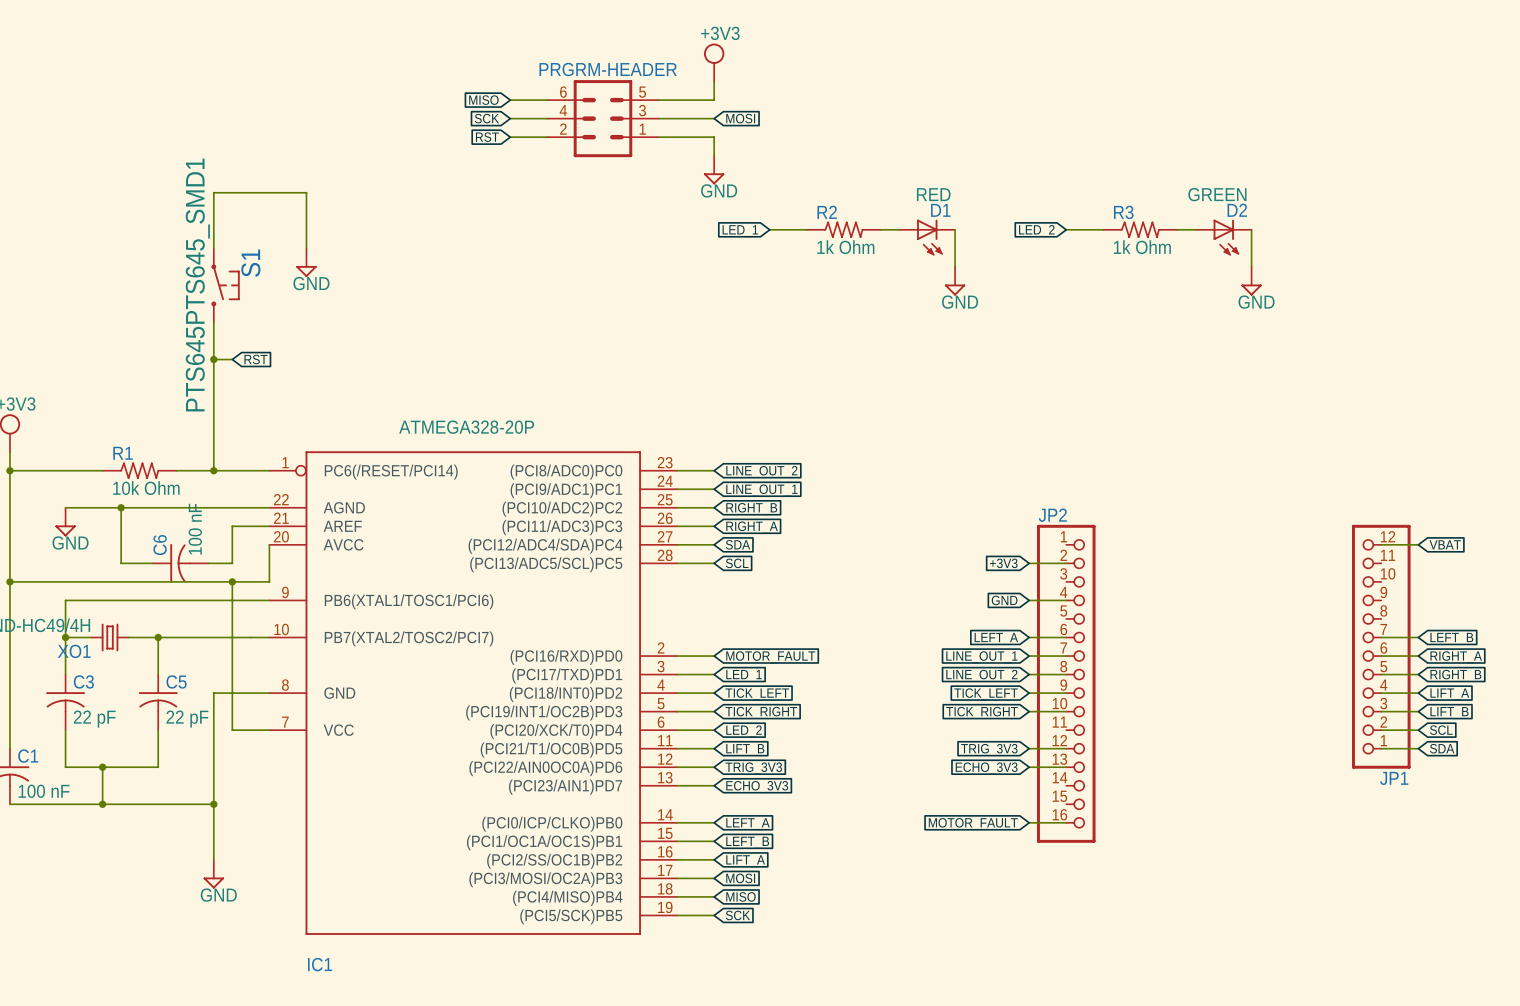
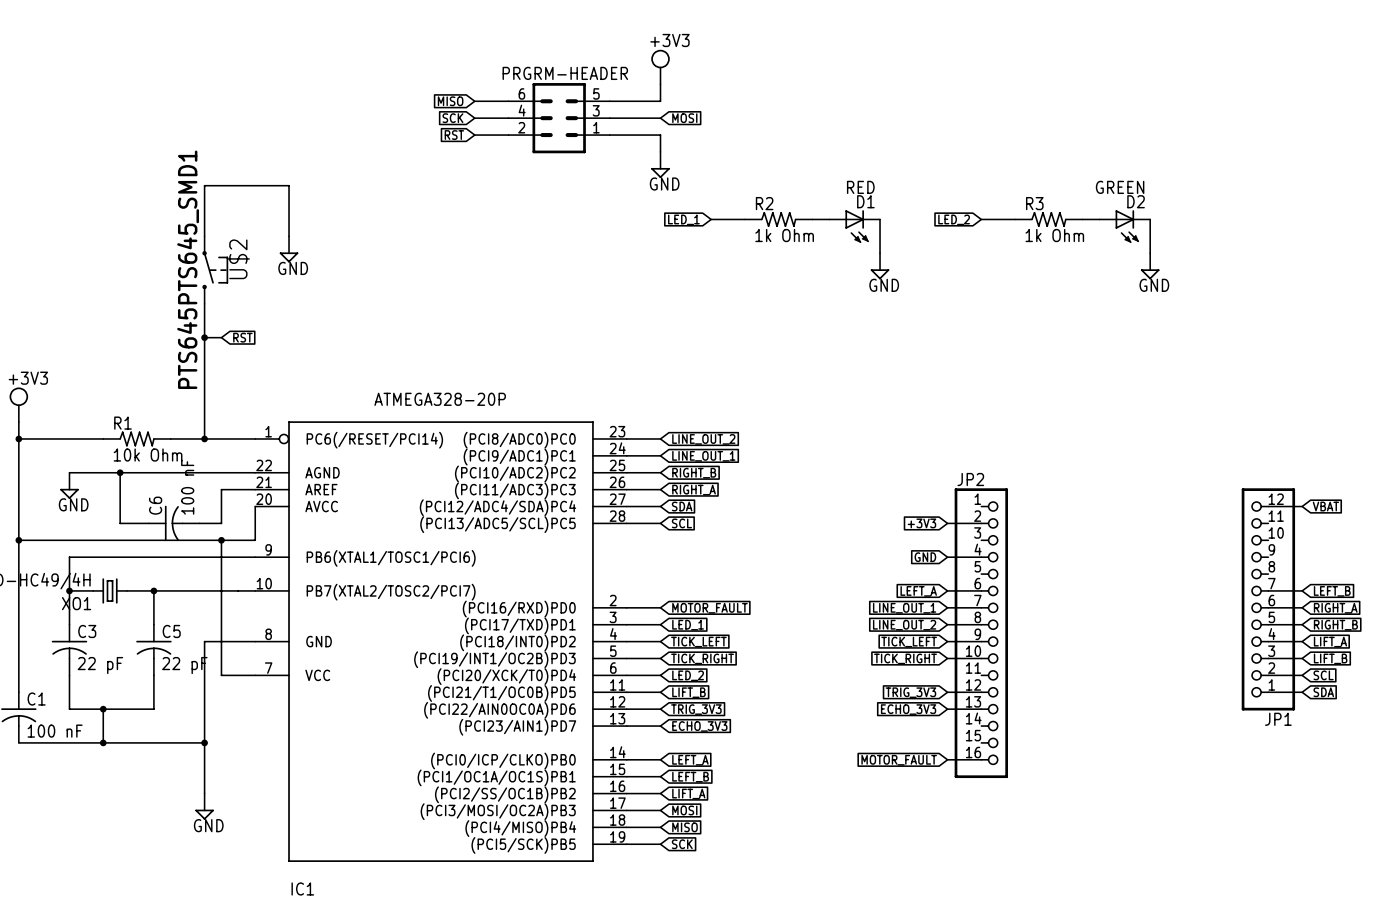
S1 name: S1 (250, 263) -> U$2 (238, 259)

